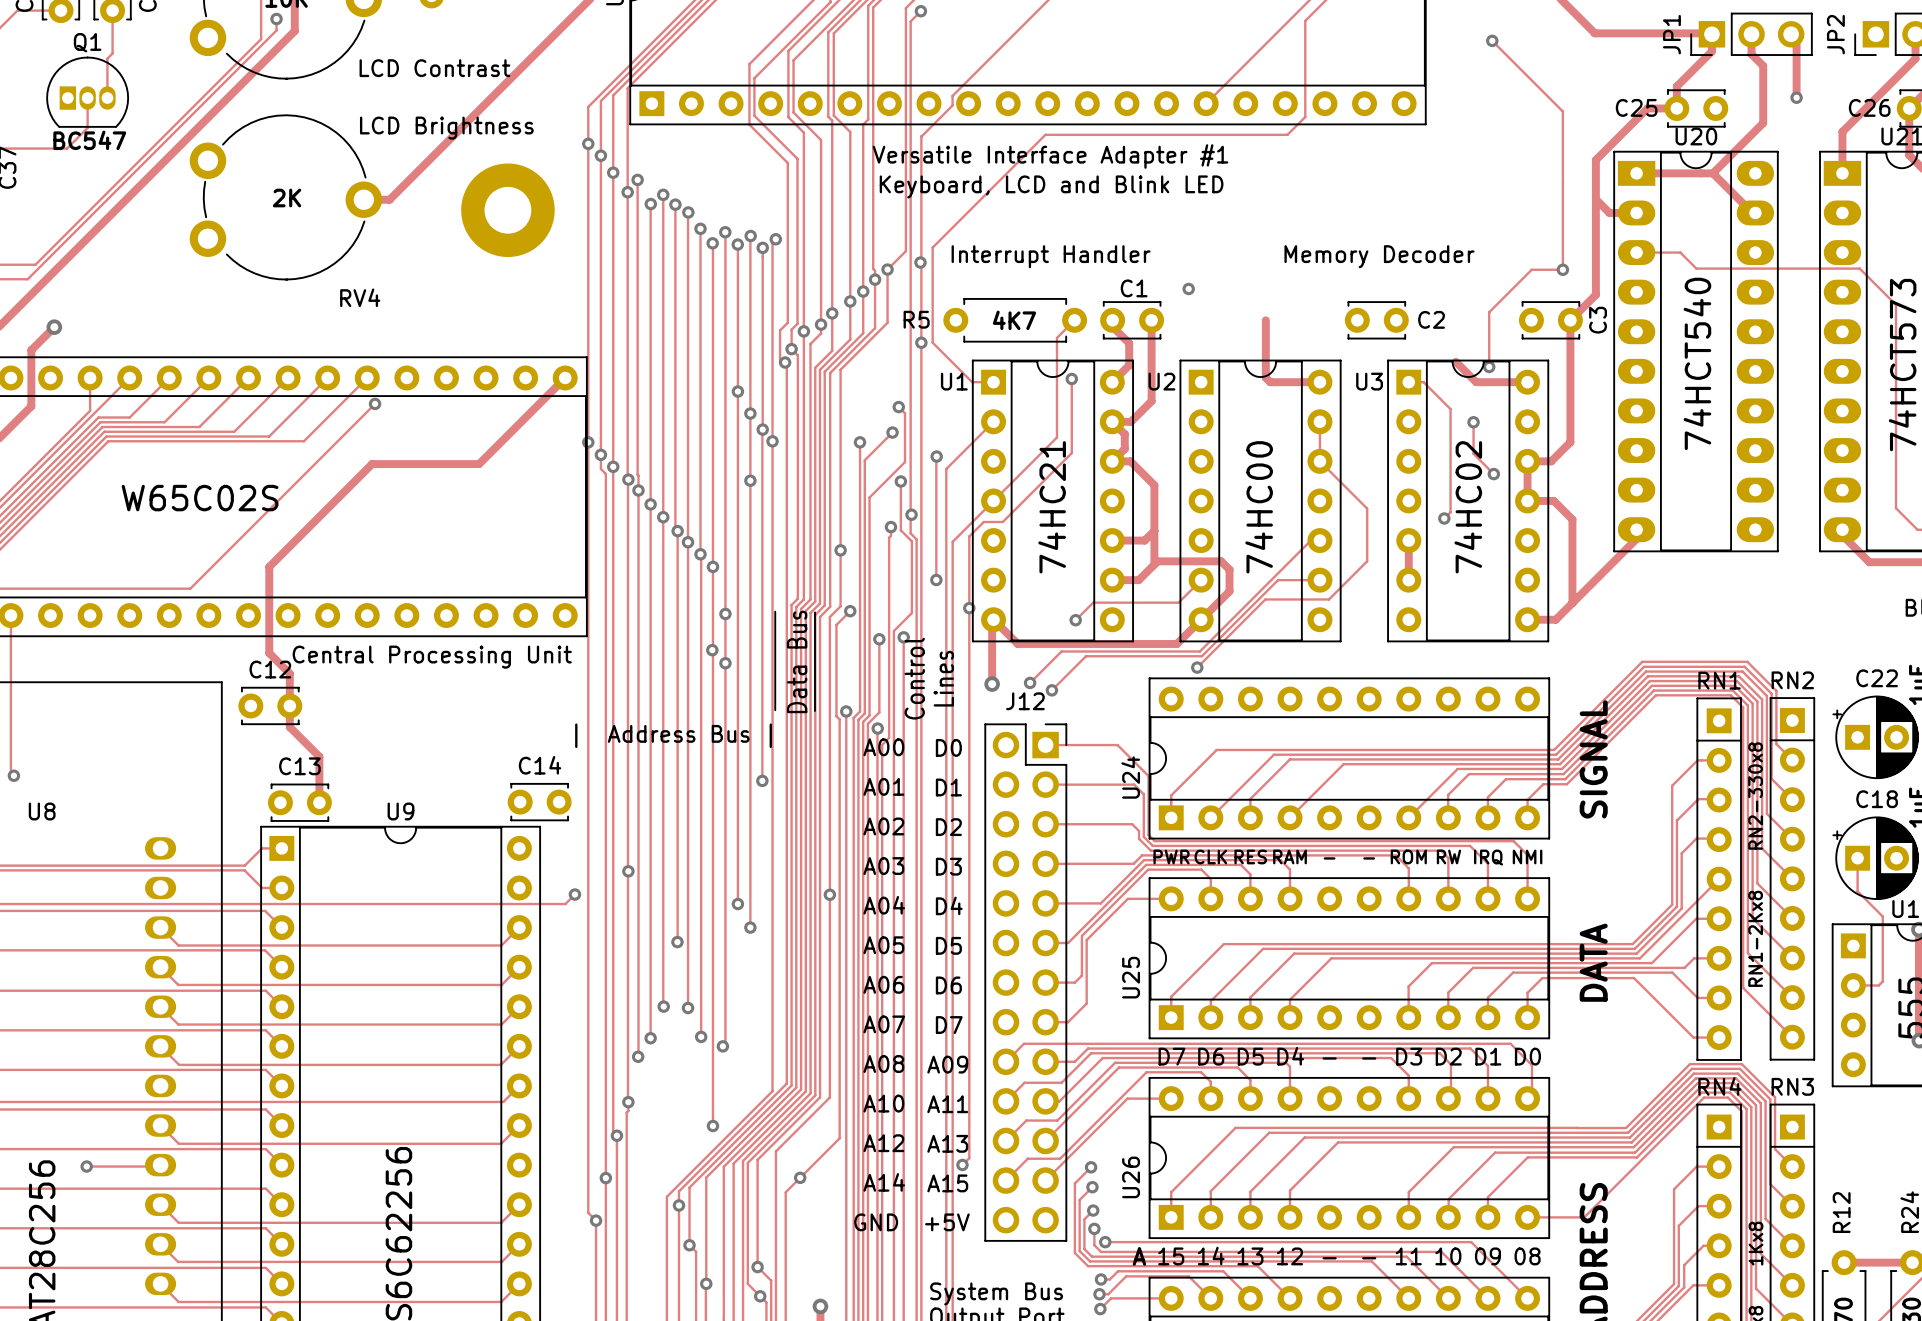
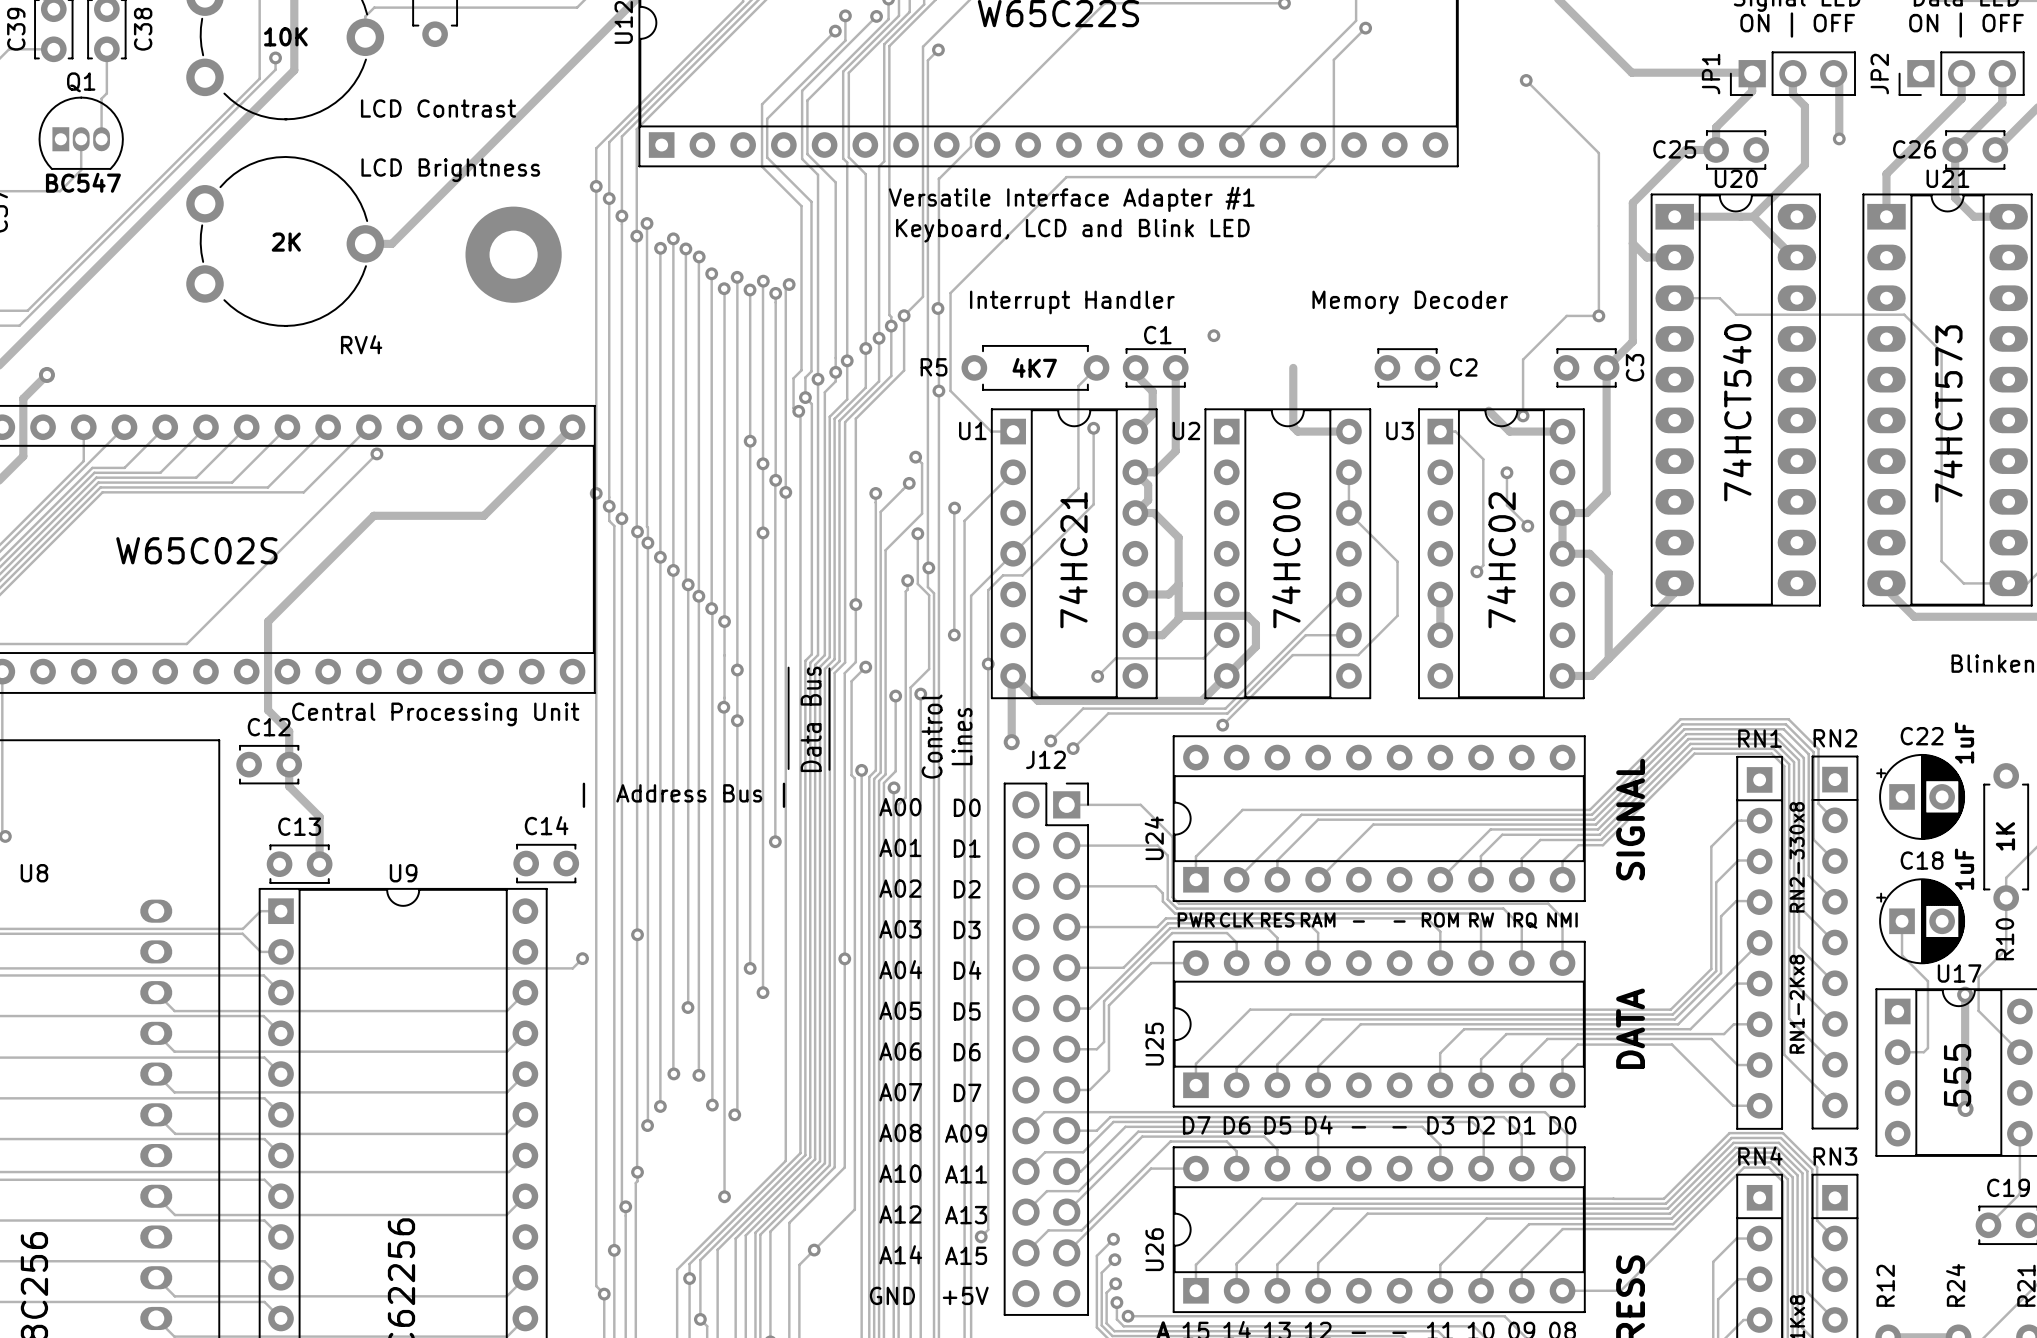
track: (160, 1165) (86, 1166) -> none
via: (86, 1166) -> none

